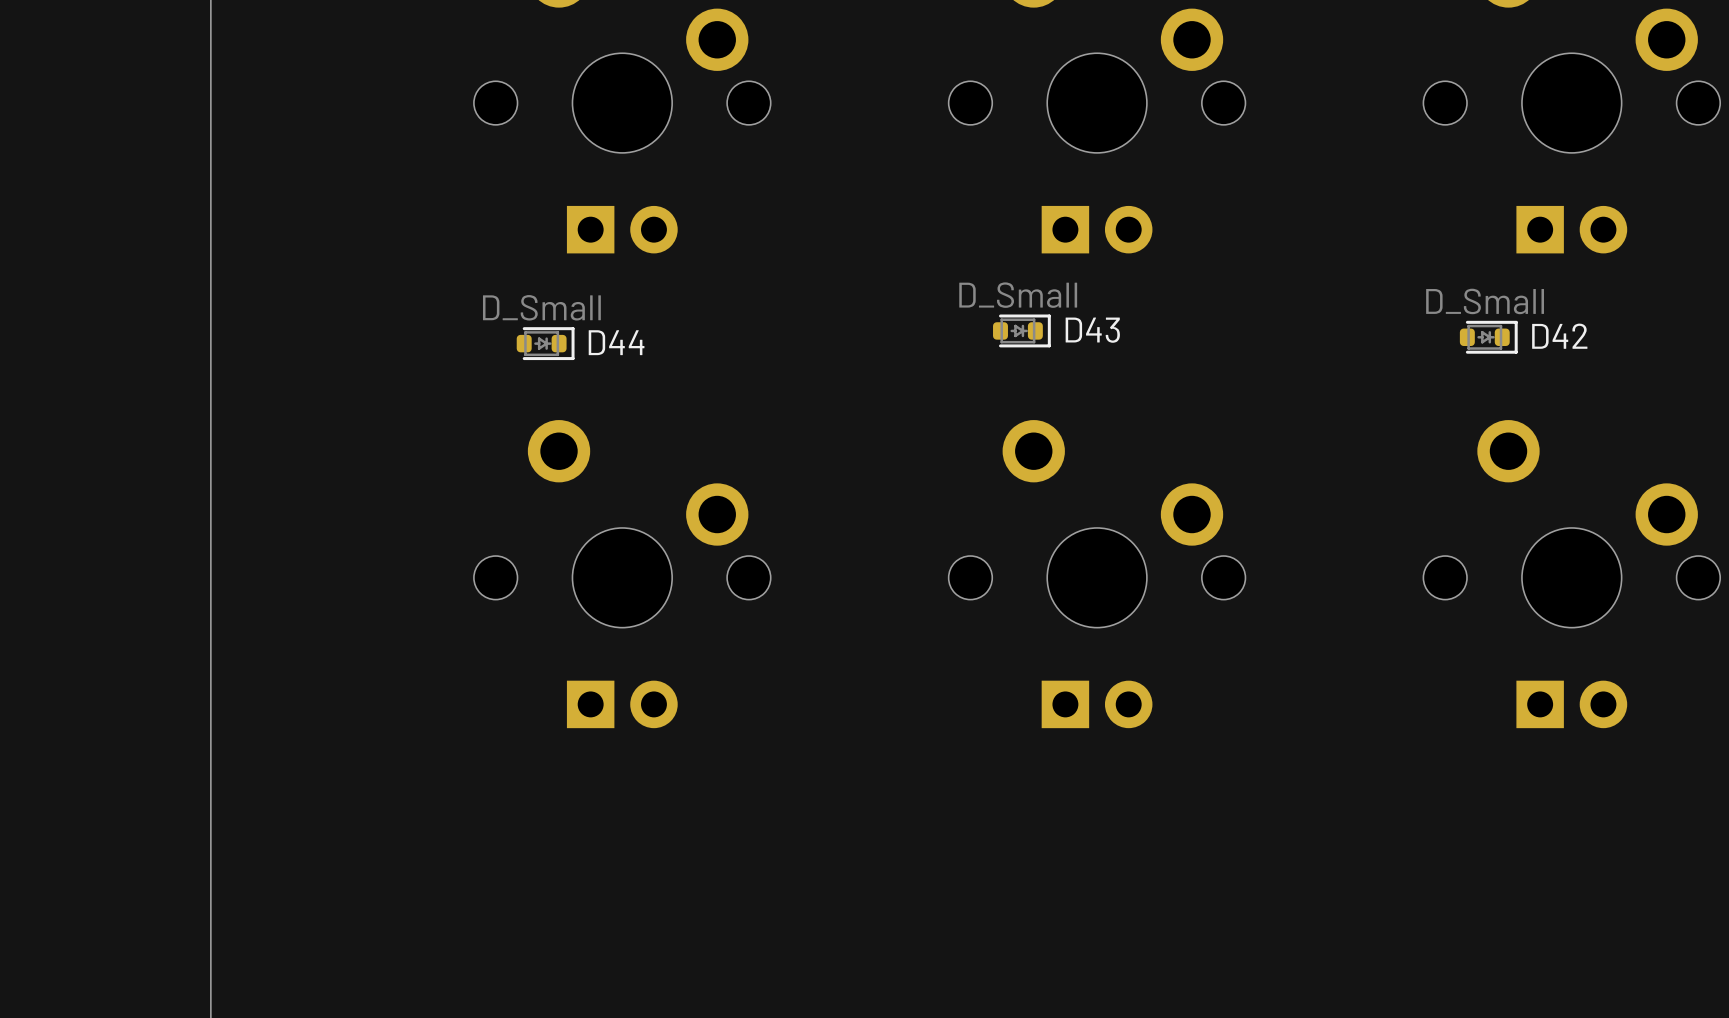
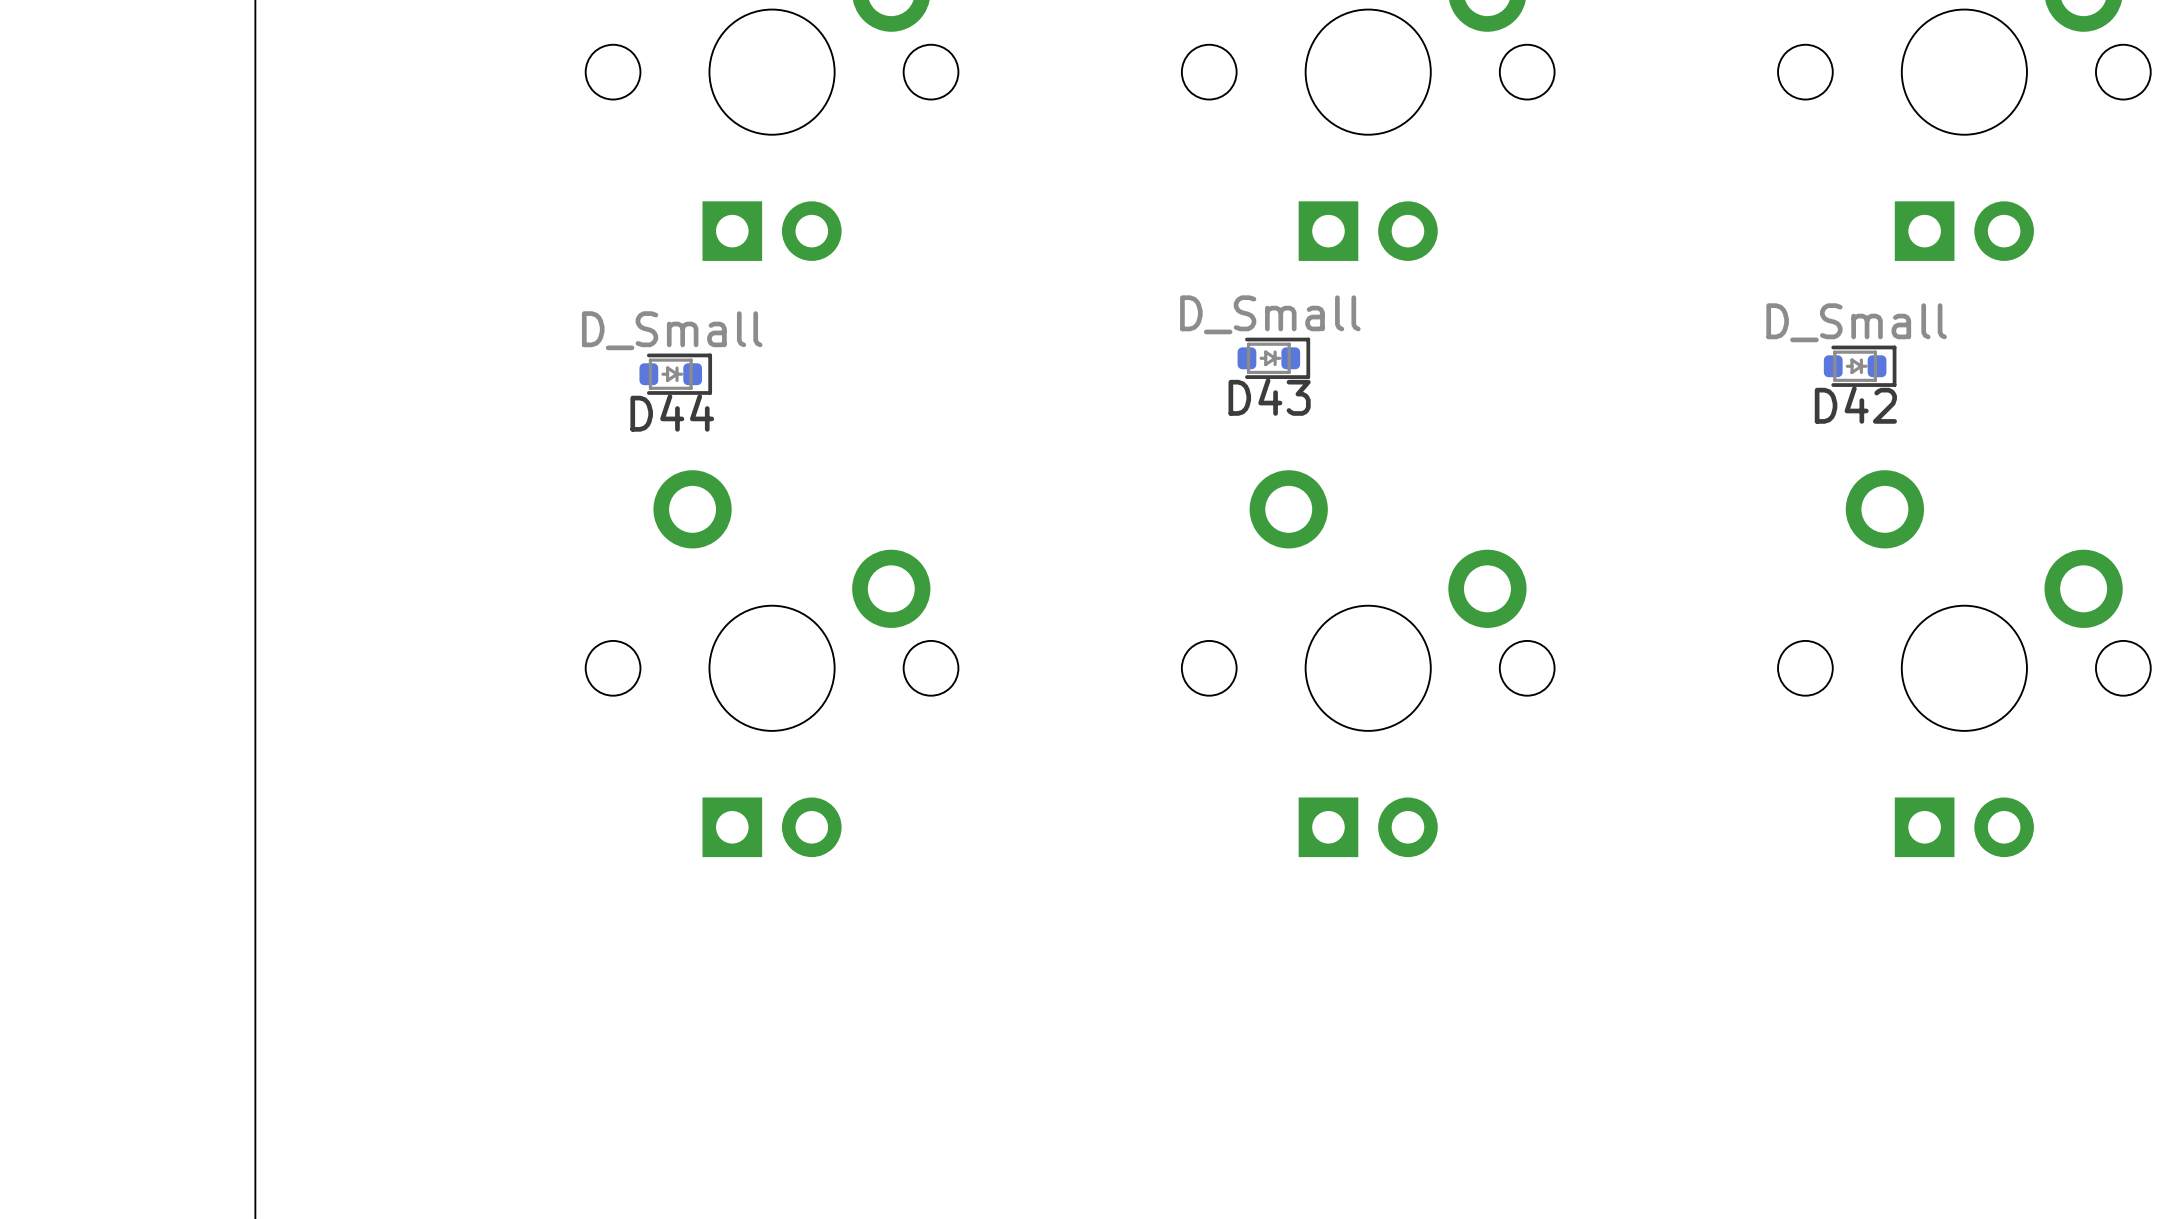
D43 name position: D43 (1092, 330) -> D43 (1269, 397)
D42 name position: D42 (1559, 336) -> D42 (1855, 405)
D44 name position: D44 (616, 342) -> D44 (672, 412)

